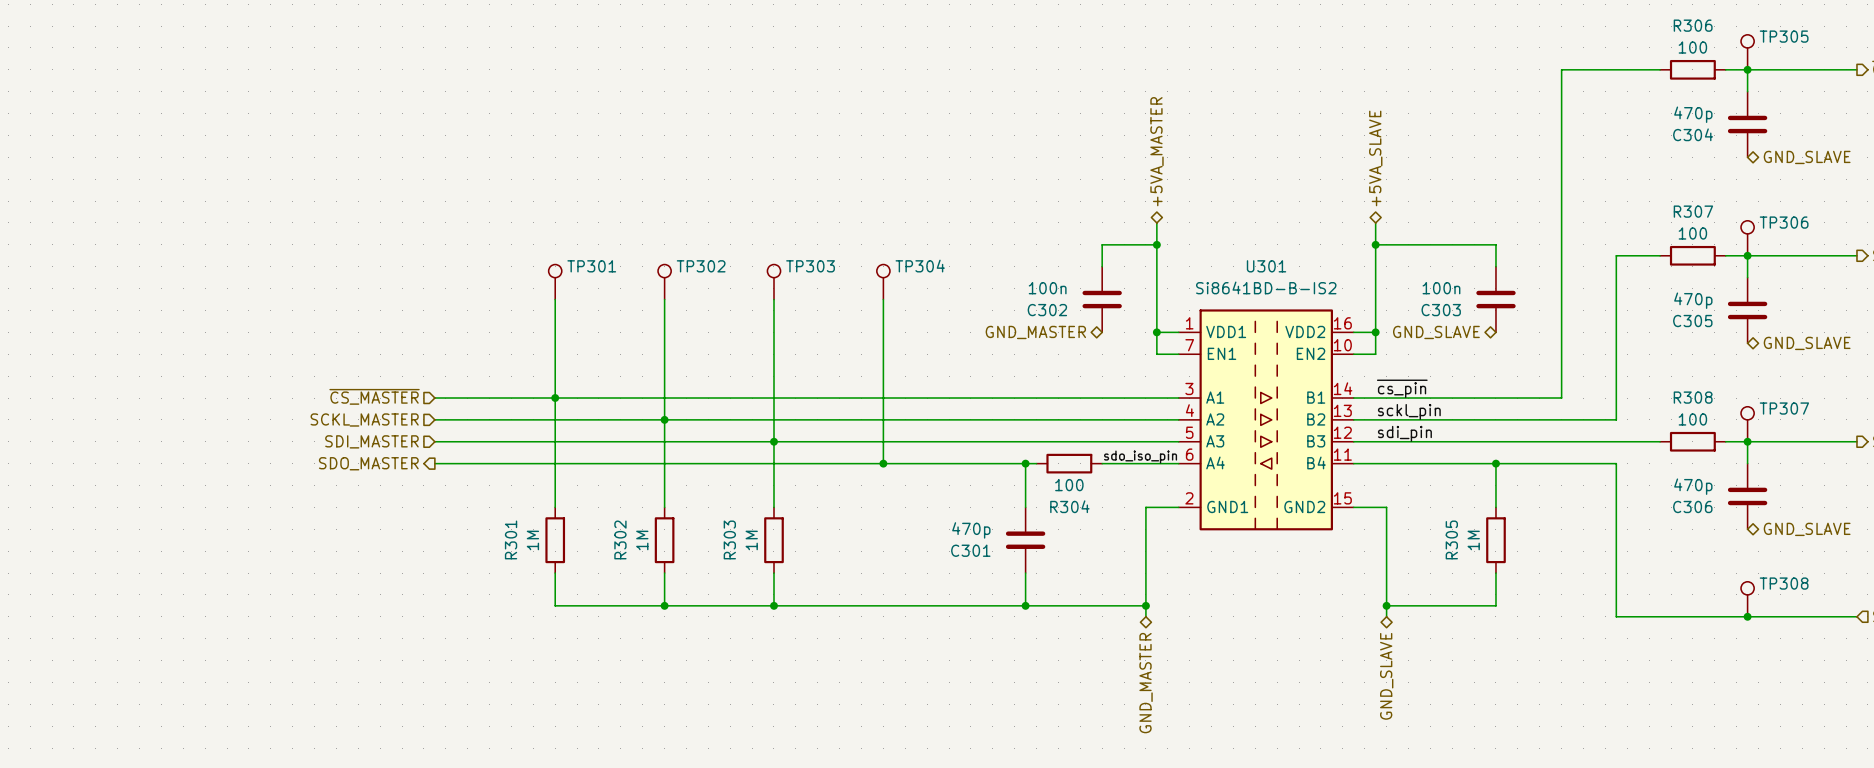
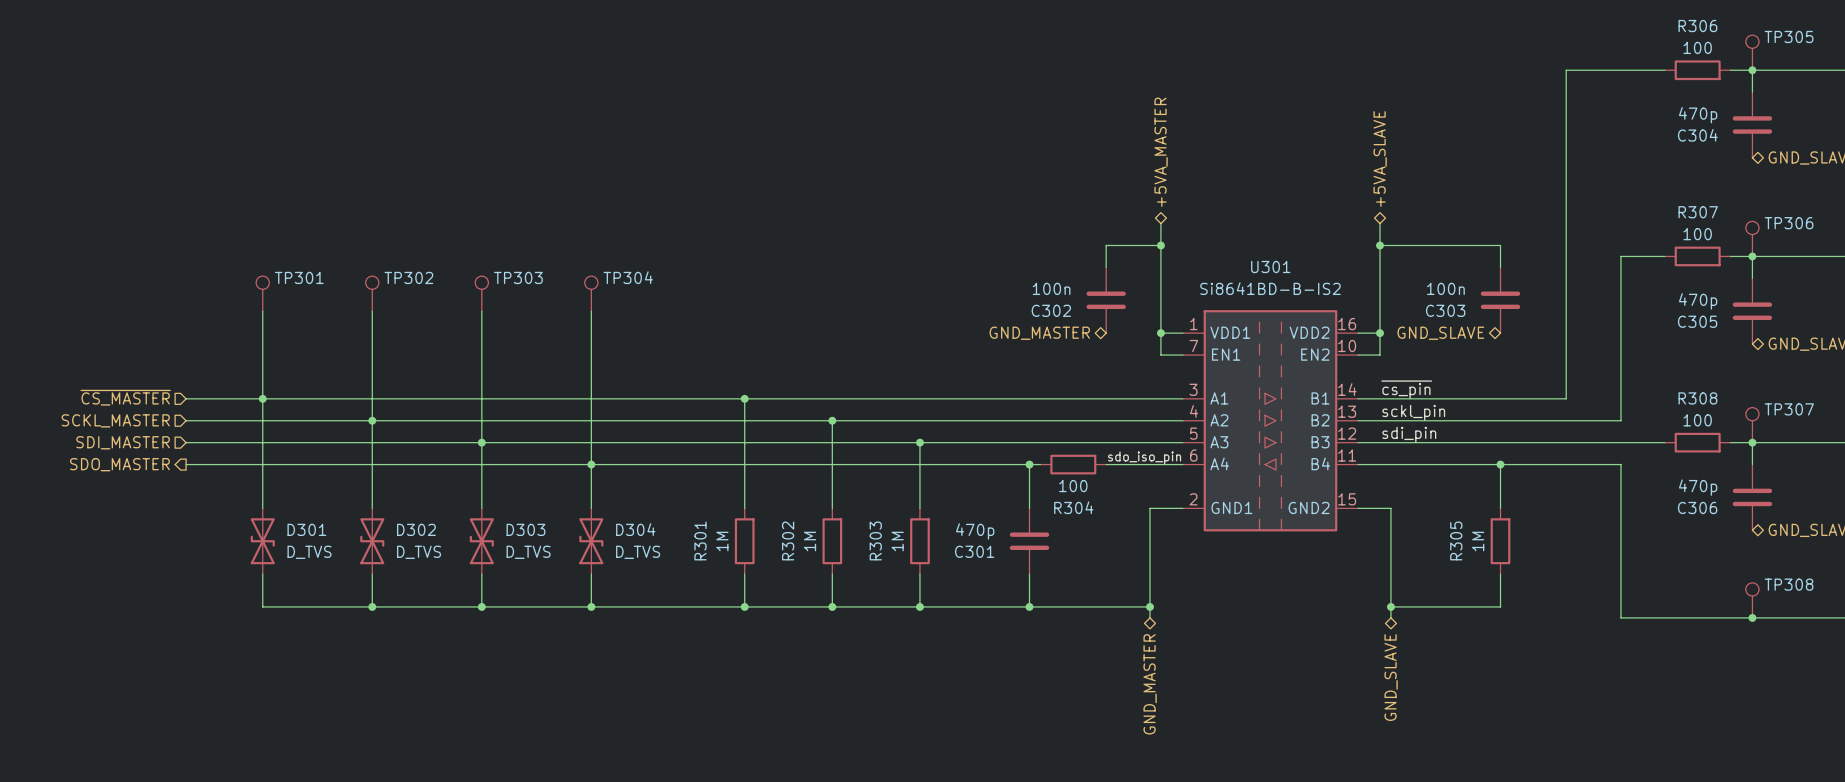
TP301 position: (555, 282) -> (262, 293)
TP302 position: (664, 282) -> (372, 293)
TP303 position: (773, 282) -> (481, 293)
TP304 position: (883, 282) -> (591, 293)
wire: (555, 299) (555, 507) -> none
wire: (664, 299) (664, 507) -> none
wire: (773, 299) (773, 507) -> none
wire: (883, 299) (883, 463) -> none
wire: none -> (262, 311) (262, 508)
wire: none -> (372, 311) (372, 508)
wire: none -> (481, 311) (481, 508)
wire: none -> (591, 311) (591, 508)
hierarchical label: none -> ~{CS_MASTER} (125, 397)
hierarchical label: ~{CS_MASTER} (374, 396) -> none
wire: none -> (186, 398) (438, 398)
junction: none -> (262, 398)
junction: (555, 398) -> none
wire: none -> (744, 398) (744, 508)
junction: none -> (744, 398)
hierarchical label: none -> SCKL_MASTER (115, 420)
wire: none -> (186, 420) (438, 420)
hierarchical label: SCKL_MASTER (364, 419) -> none
junction: none -> (372, 420)
junction: (664, 419) -> none
wire: none -> (832, 420) (832, 508)
junction: none -> (832, 420)
hierarchical label: none -> SDI_MASTER (123, 442)
wire: none -> (186, 442) (438, 442)
hierarchical label: SDI_MASTER (371, 441) -> none
junction: none -> (481, 442)
junction: (773, 441) -> none
wire: none -> (919, 442) (919, 508)
junction: none -> (919, 442)
hierarchical label: none -> SDO_MASTER (119, 464)
wire: none -> (186, 464) (438, 464)
hierarchical label: SDO_MASTER (368, 463) -> none
junction: none -> (591, 464)
junction: (883, 463) -> none
D301: none -> D_TVS (262, 541)
D302: none -> D_TVS (372, 541)
D303: none -> D_TVS (481, 541)
R301 position: (555, 540) -> (744, 541)
D304: none -> D_TVS (591, 541)
R302 position: (664, 540) -> (832, 541)
R303 position: (773, 540) -> (919, 541)
wire: none -> (372, 574) (372, 606)
wire: (555, 573) (555, 605) -> (262, 574) (262, 606) (558, 606)
wire: (664, 573) (664, 605) -> (481, 574) (481, 606)
wire: none -> (744, 574) (744, 606)
wire: (773, 573) (773, 605) -> (591, 574) (591, 606)
wire: none -> (832, 574) (832, 606)
wire: none -> (919, 574) (919, 606)
junction: none -> (372, 606)
junction: none -> (481, 606)
junction: none -> (591, 606)
junction: (664, 605) -> none
junction: none -> (744, 606)
junction: (773, 605) -> none
junction: none -> (832, 606)
junction: none -> (919, 606)

